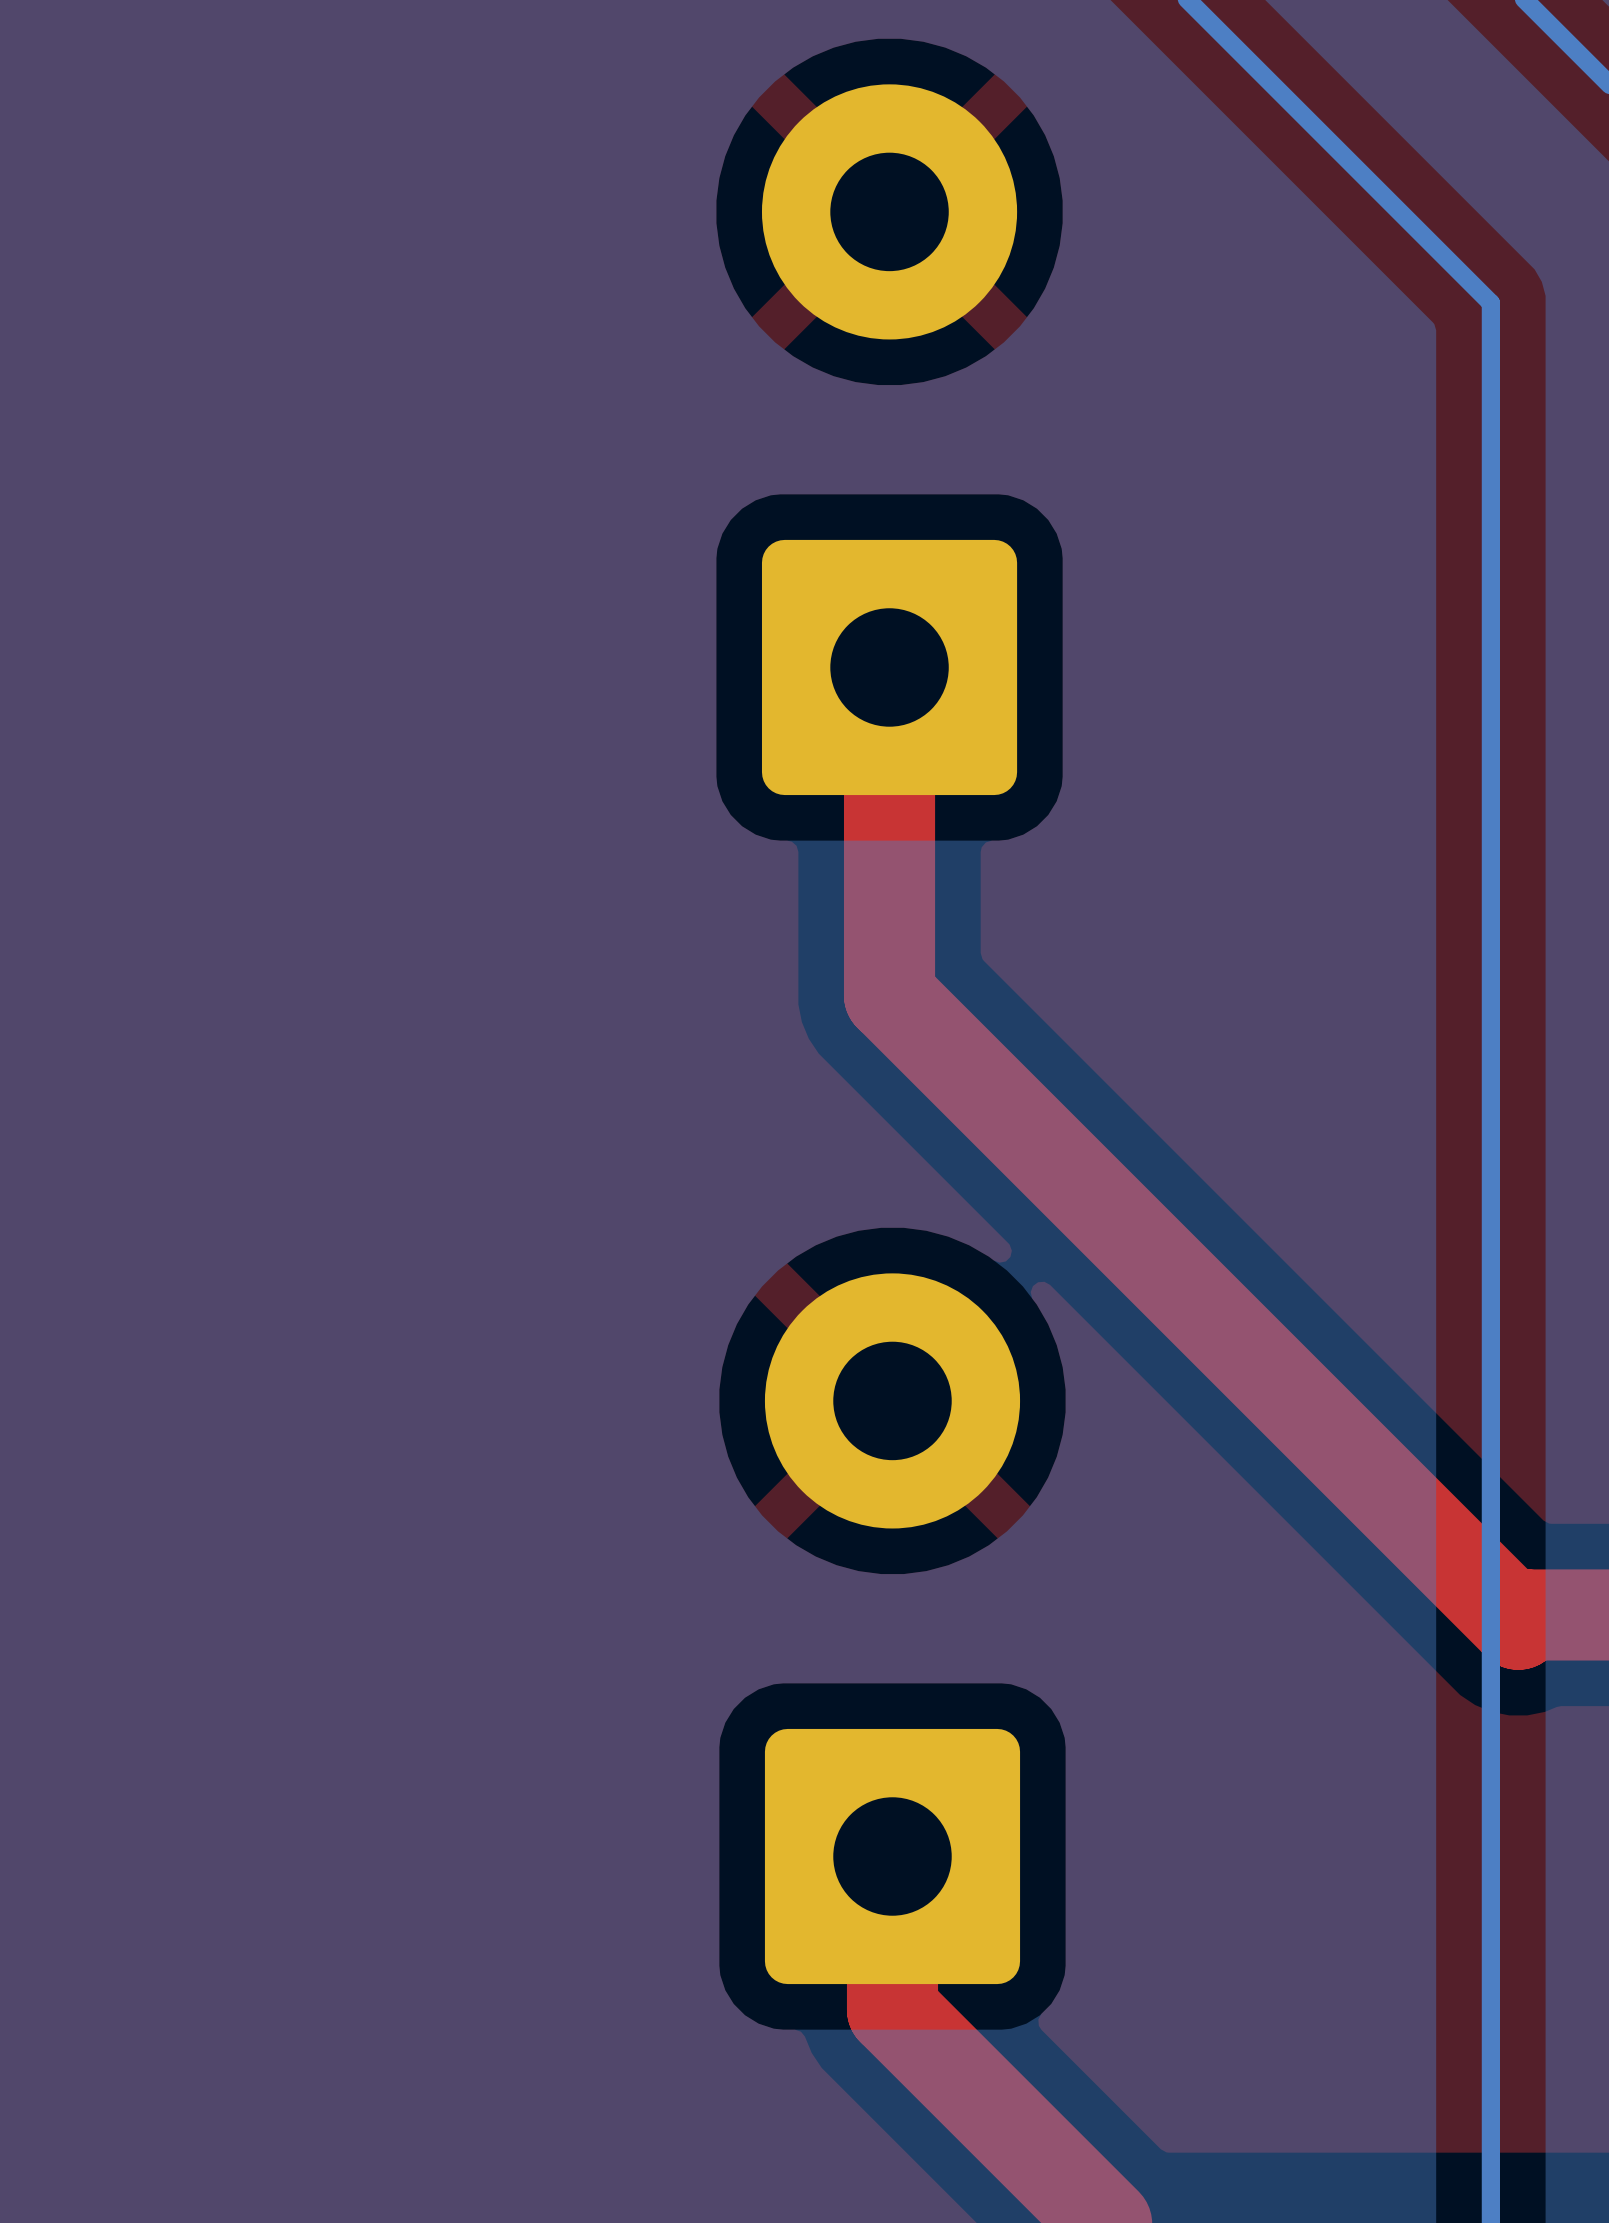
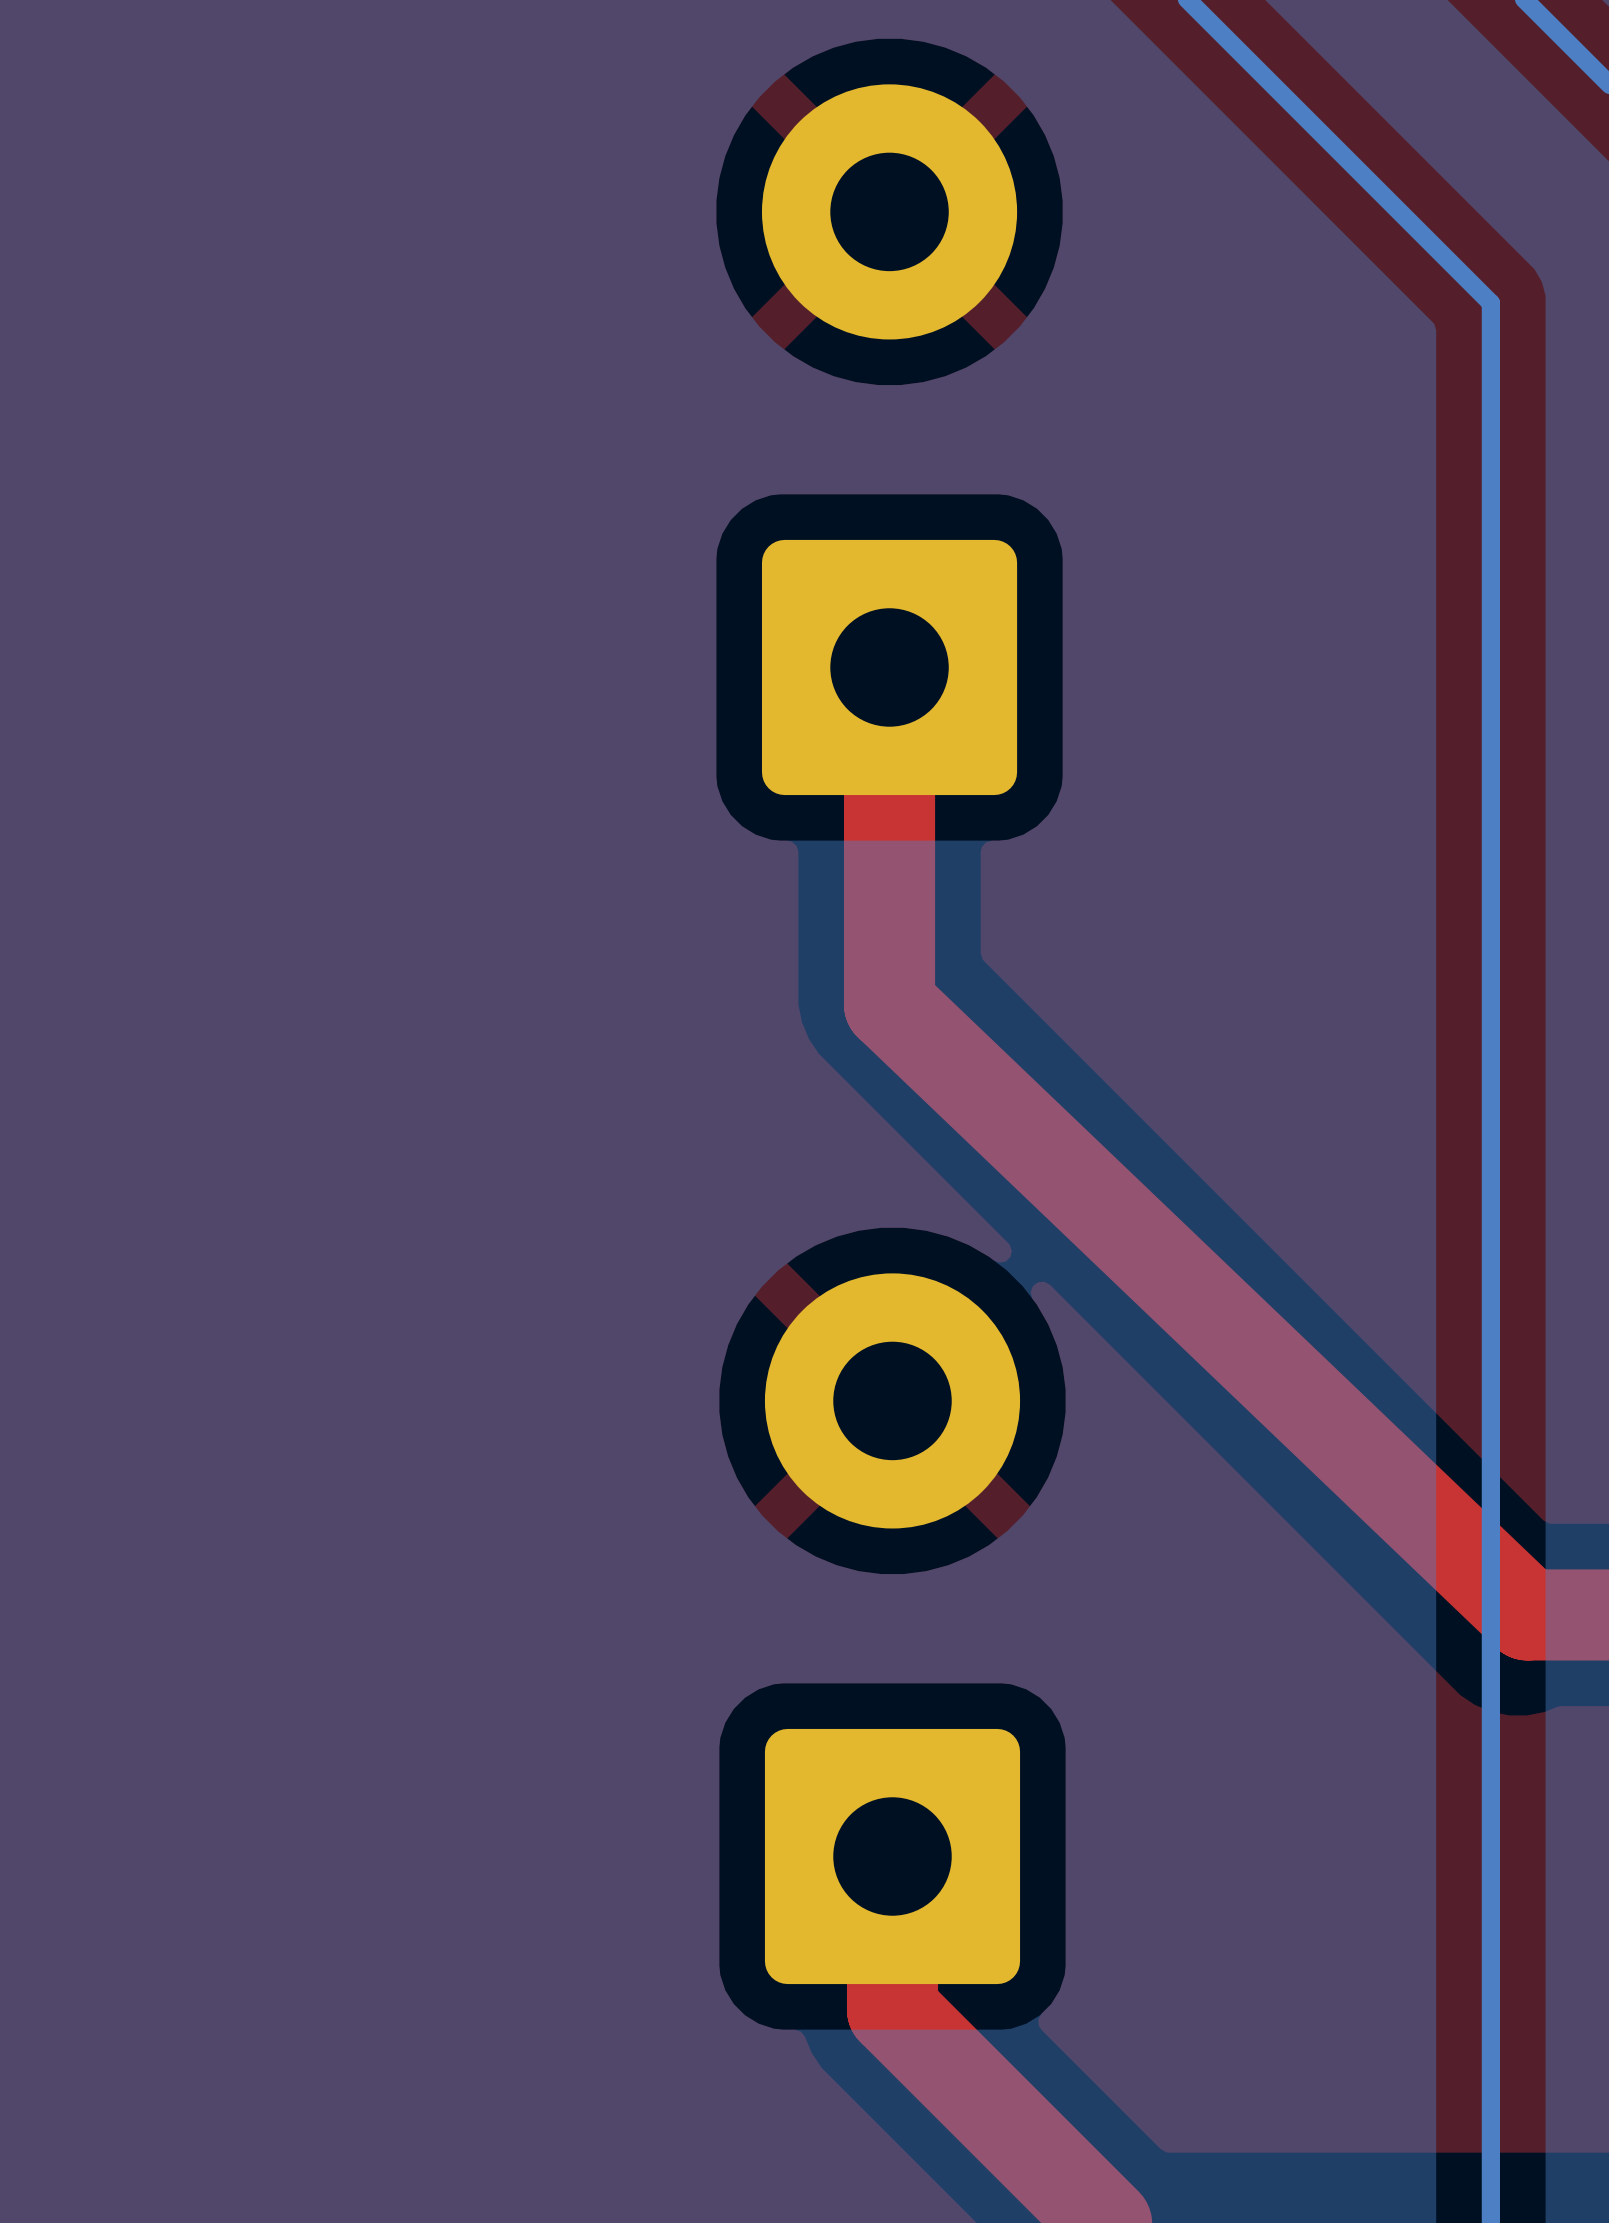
top track: (889, 995) (1518, 1624) (1527, 1614) -> (889, 995) (889, 1004) (1527, 1614)

